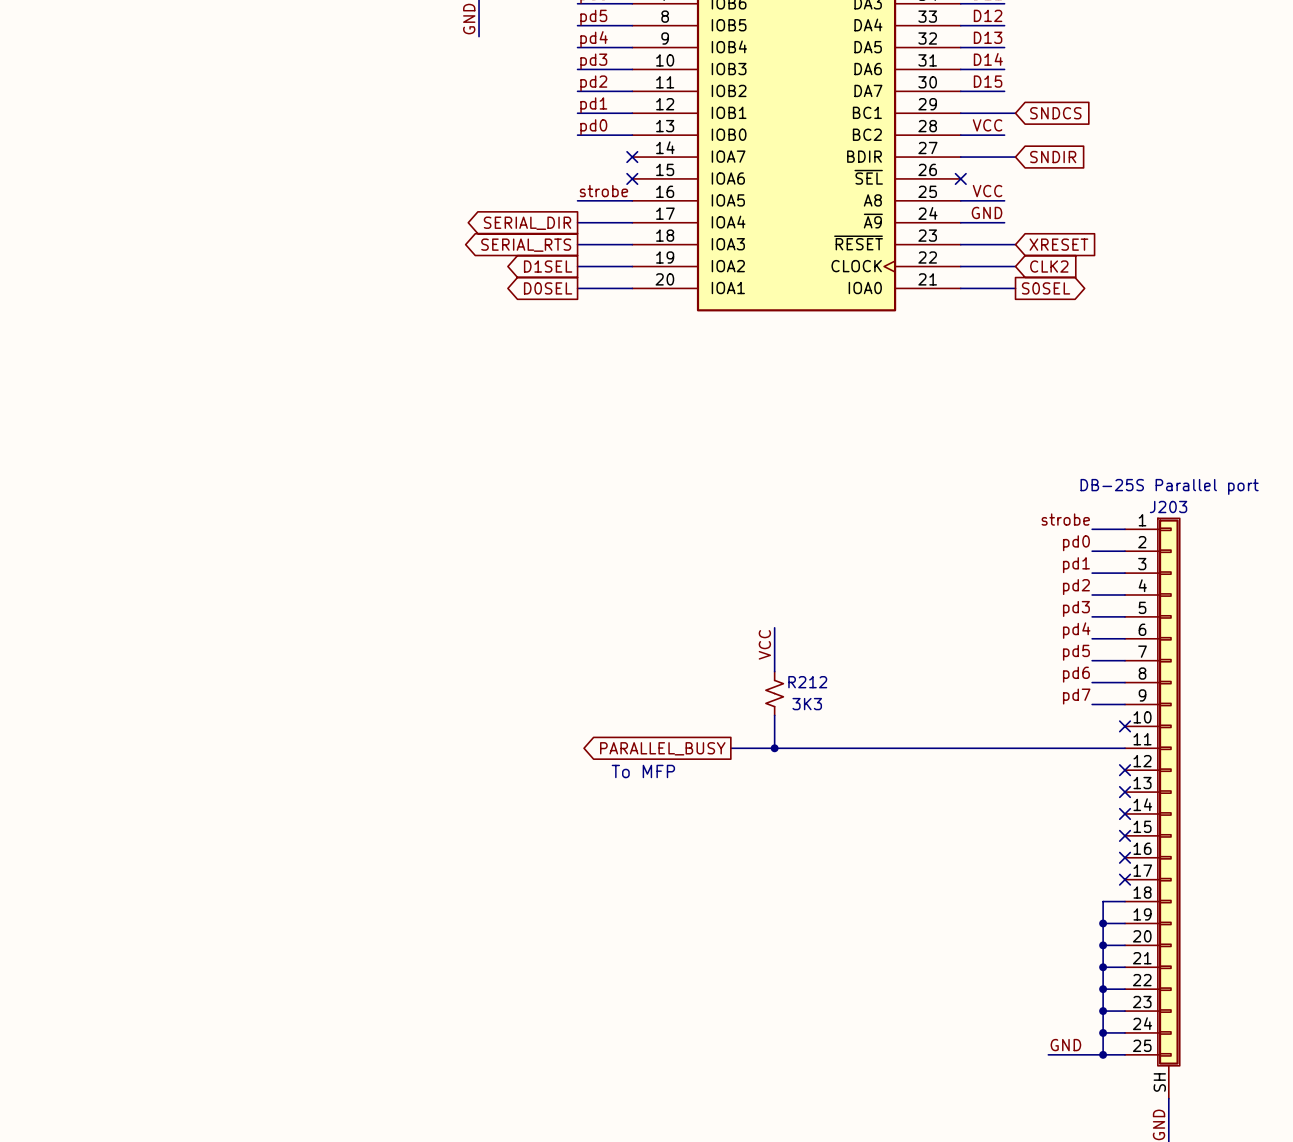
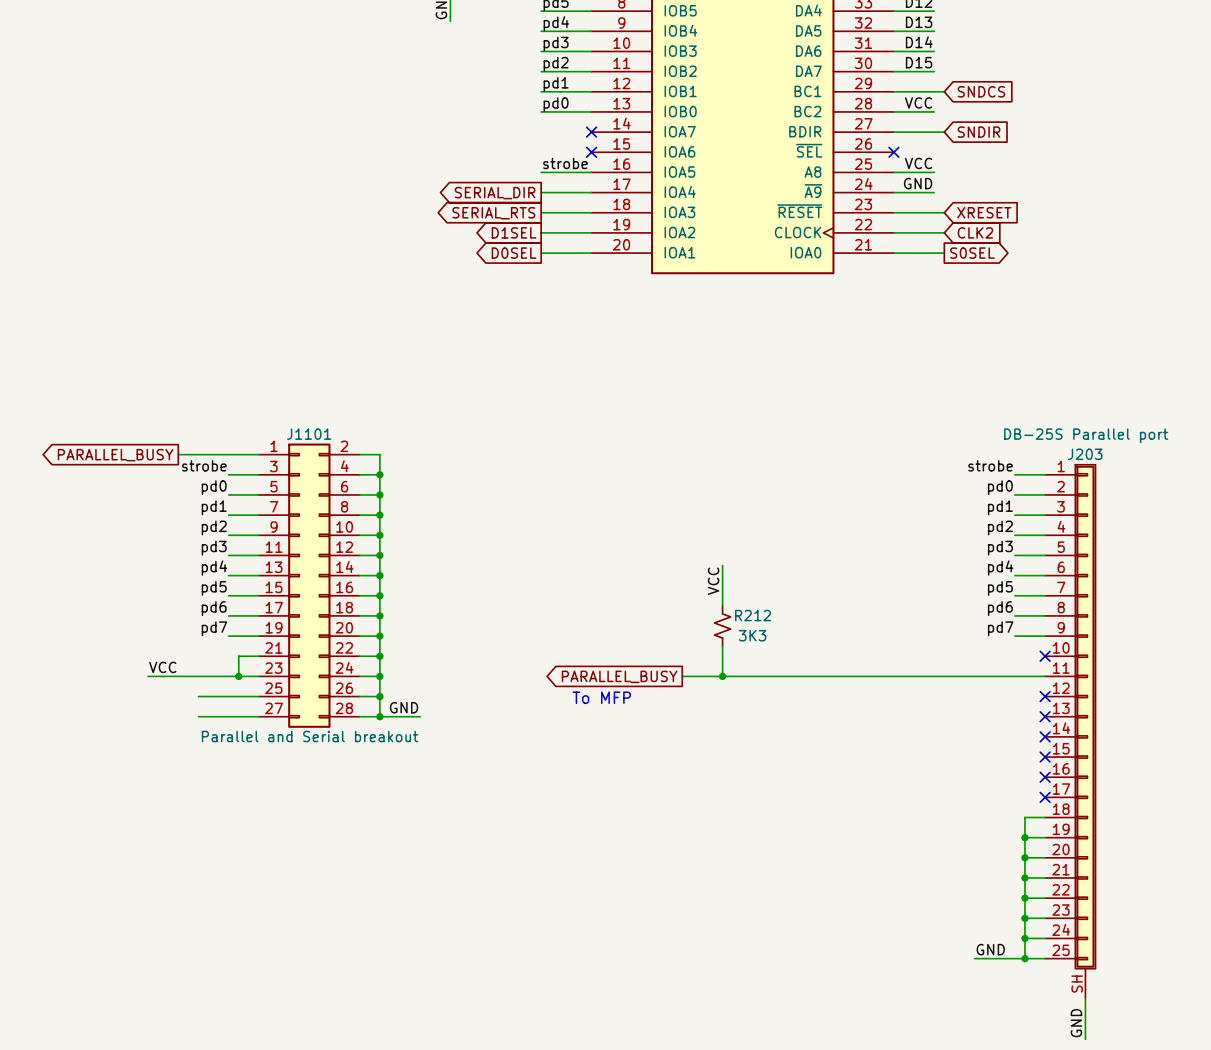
global label: none -> PARALLEL_BUSY (115, 455)
wire: none -> (178, 454) (258, 454)
wire: none -> (359, 454) (379, 454) (379, 716)
label: none -> strobe (204, 465)
wire: none -> (228, 474) (258, 474)
wire: none -> (359, 474) (379, 474)
junction: none -> (379, 474)
label: none -> pd0 (214, 487)
wire: none -> (228, 494) (258, 494)
wire: none -> (359, 494) (379, 494)
junction: none -> (379, 494)
label: none -> pd1 (214, 507)
wire: none -> (228, 515) (258, 515)
wire: none -> (359, 515) (379, 515)
junction: none -> (379, 515)
label: none -> pd2 (214, 527)
wire: none -> (228, 535) (258, 535)
wire: none -> (359, 535) (379, 535)
junction: none -> (379, 535)
label: none -> pd3 (214, 548)
wire: none -> (228, 555) (258, 555)
wire: none -> (359, 555) (379, 555)
junction: none -> (379, 555)
label: none -> pd4 (214, 568)
wire: none -> (228, 575) (258, 575)
wire: none -> (359, 575) (379, 575)
junction: none -> (379, 575)
J1101: none -> Parallel and Serial breakout (309, 585)
label: none -> pd5 (214, 588)
wire: none -> (228, 595) (258, 595)
wire: none -> (359, 595) (379, 595)
junction: none -> (379, 595)
label: none -> pd6 (214, 608)
wire: none -> (228, 615) (258, 615)
wire: none -> (359, 615) (379, 615)
junction: none -> (379, 615)
label: none -> pd7 (214, 628)
wire: none -> (228, 636) (258, 636)
wire: none -> (359, 636) (379, 636)
junction: none -> (379, 636)
wire: none -> (258, 656) (238, 656) (238, 676)
wire: none -> (359, 656) (379, 656)
junction: none -> (379, 656)
label: none -> VCC (162, 667)
wire: none -> (148, 676) (258, 676)
junction: none -> (238, 676)
wire: none -> (359, 676) (379, 676)
junction: none -> (379, 676)
wire: none -> (198, 696) (258, 696)
wire: none -> (359, 696) (379, 696)
junction: none -> (379, 696)
label: none -> GND (404, 707)
wire: none -> (198, 716) (258, 716)
wire: none -> (359, 716) (420, 716)
junction: none -> (379, 716)

